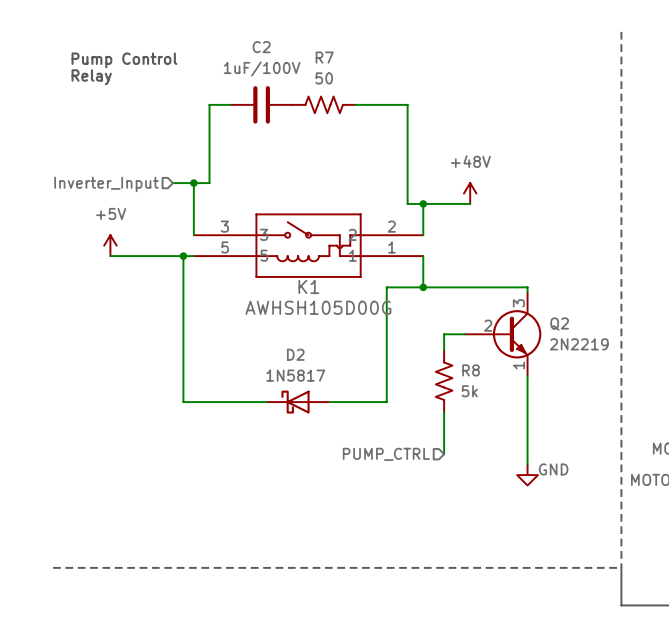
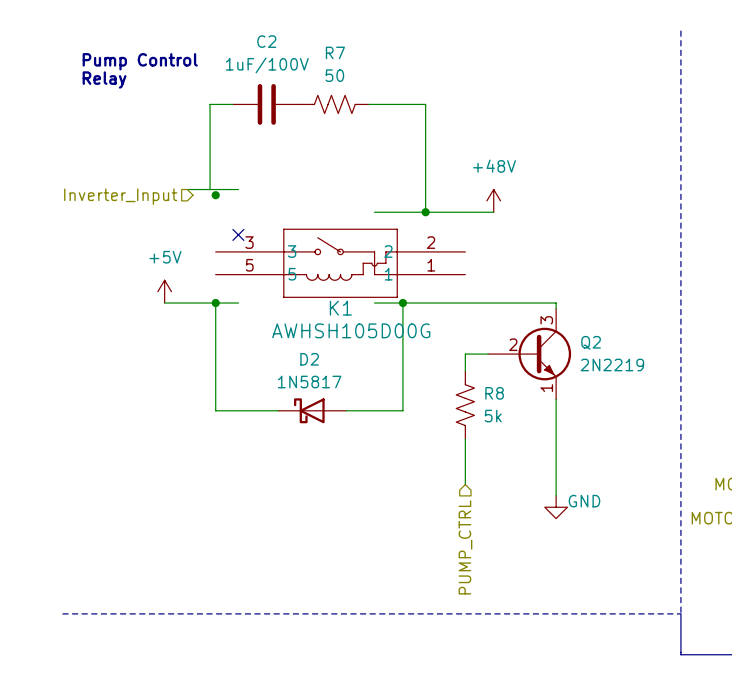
wire: none -> (232, 104) (210, 104) (210, 189)
wire: none -> (368, 104) (425, 104) (425, 212)
wire: (230, 104) (209, 104) (209, 183) (172, 183) -> none
C2 position: (261, 104) -> (266, 104)
R7 position: (324, 104) -> (334, 104)
wire: (355, 104) (407, 104) (407, 203) (470, 203) -> none
wire: none -> (187, 189) (238, 189)
wire: (193, 183) (193, 235) -> none
power symbol position: +48V (470, 193) -> +48V (493, 200)
wire: none -> (374, 212) (493, 212)
wire: (423, 203) (423, 235) -> none
junction position: (423, 203) -> (425, 212)
no-connect mark: none -> (238, 234)
power symbol position: +5V (110, 245) -> +5V (164, 291)
wire: (110, 256) (193, 256) -> none
wire: (183, 256) (183, 402) (266, 402) -> none
junction position: (183, 256) -> (215, 303)
wire: (423, 256) (423, 287) -> none
wire: none -> (164, 303) (238, 303)
wire: none -> (215, 303) (215, 410) (278, 410)
wire: none -> (374, 303) (556, 303) (556, 308)
wire: none -> (402, 303) (402, 410) (346, 410)
junction: none -> (402, 303)
junction: (423, 287) -> none
wire: (527, 292) (527, 287) (386, 287) (386, 402) (329, 402) -> none
wire: (464, 334) (444, 334) (444, 349) -> (488, 354) (465, 354) (465, 371)
Q2 position: (503, 334) -> (529, 354)
wire: (527, 376) (527, 464) -> (556, 399) (556, 495)
R8 position: (444, 381) -> (465, 405)
D2 position: (298, 402) -> (312, 410)
wire: (444, 412) (444, 454) -> (465, 439) (465, 484)
hierarchical label rotation: 0° (386, 454) -> 90° counterclockwise (465, 547)
power symbol position: GND (527, 475) -> GND (556, 507)

